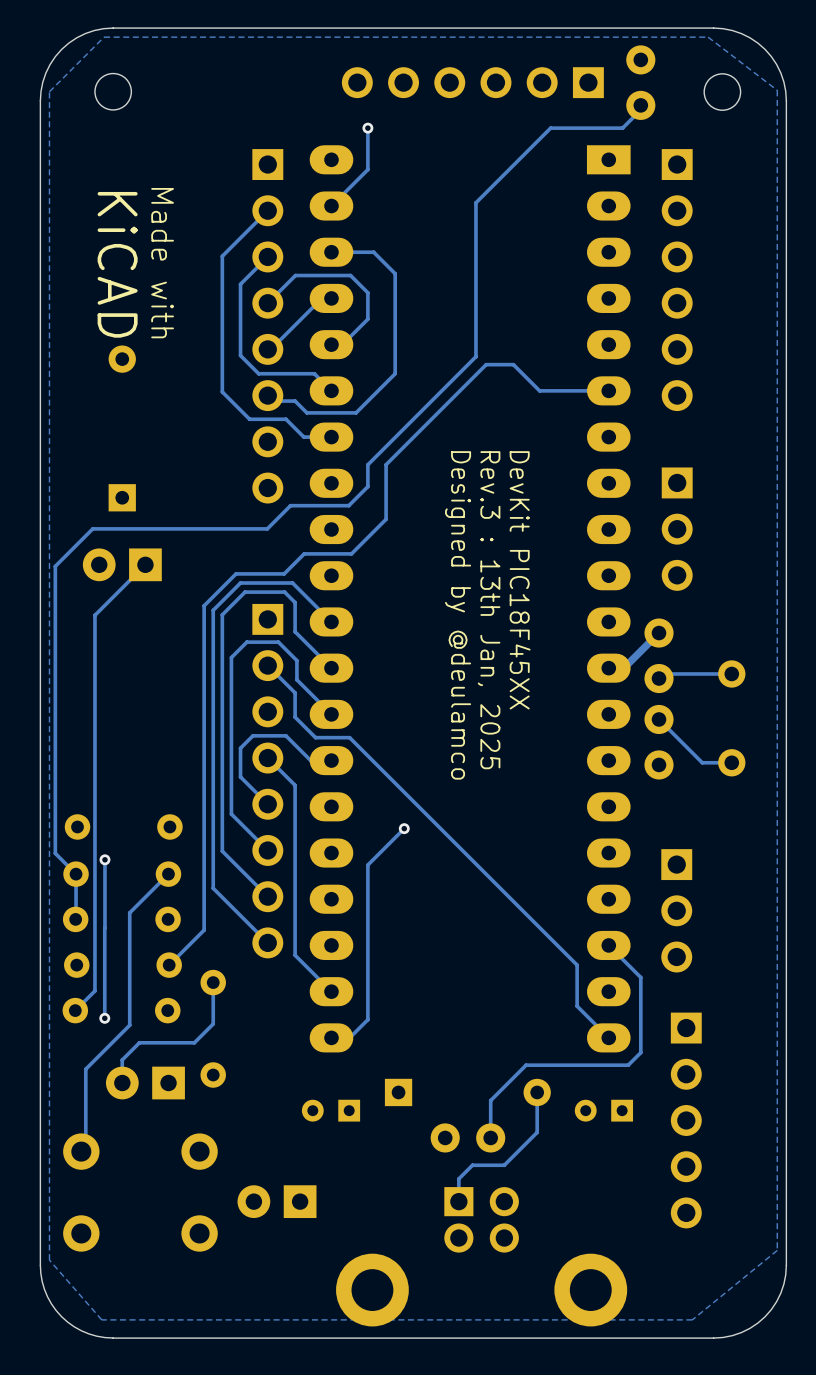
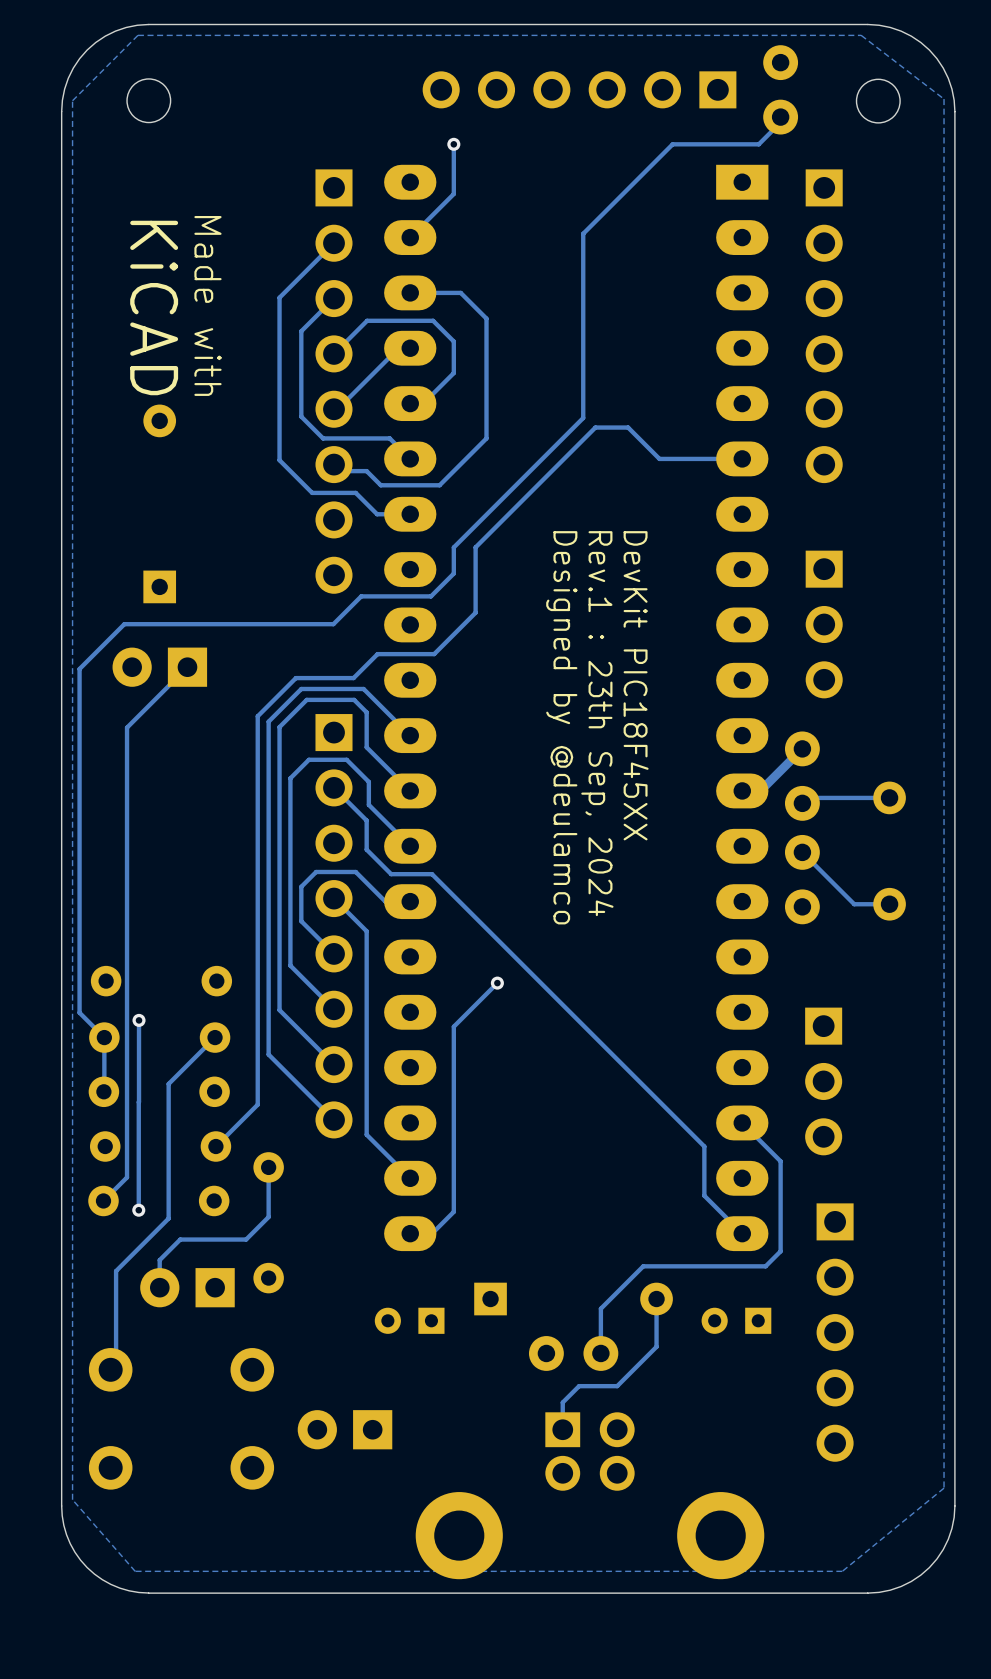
text: Rev.3 : 13th Jan, 2025 (489, 610) -> Rev.1 : 23th Sep, 2024 (597, 723)

